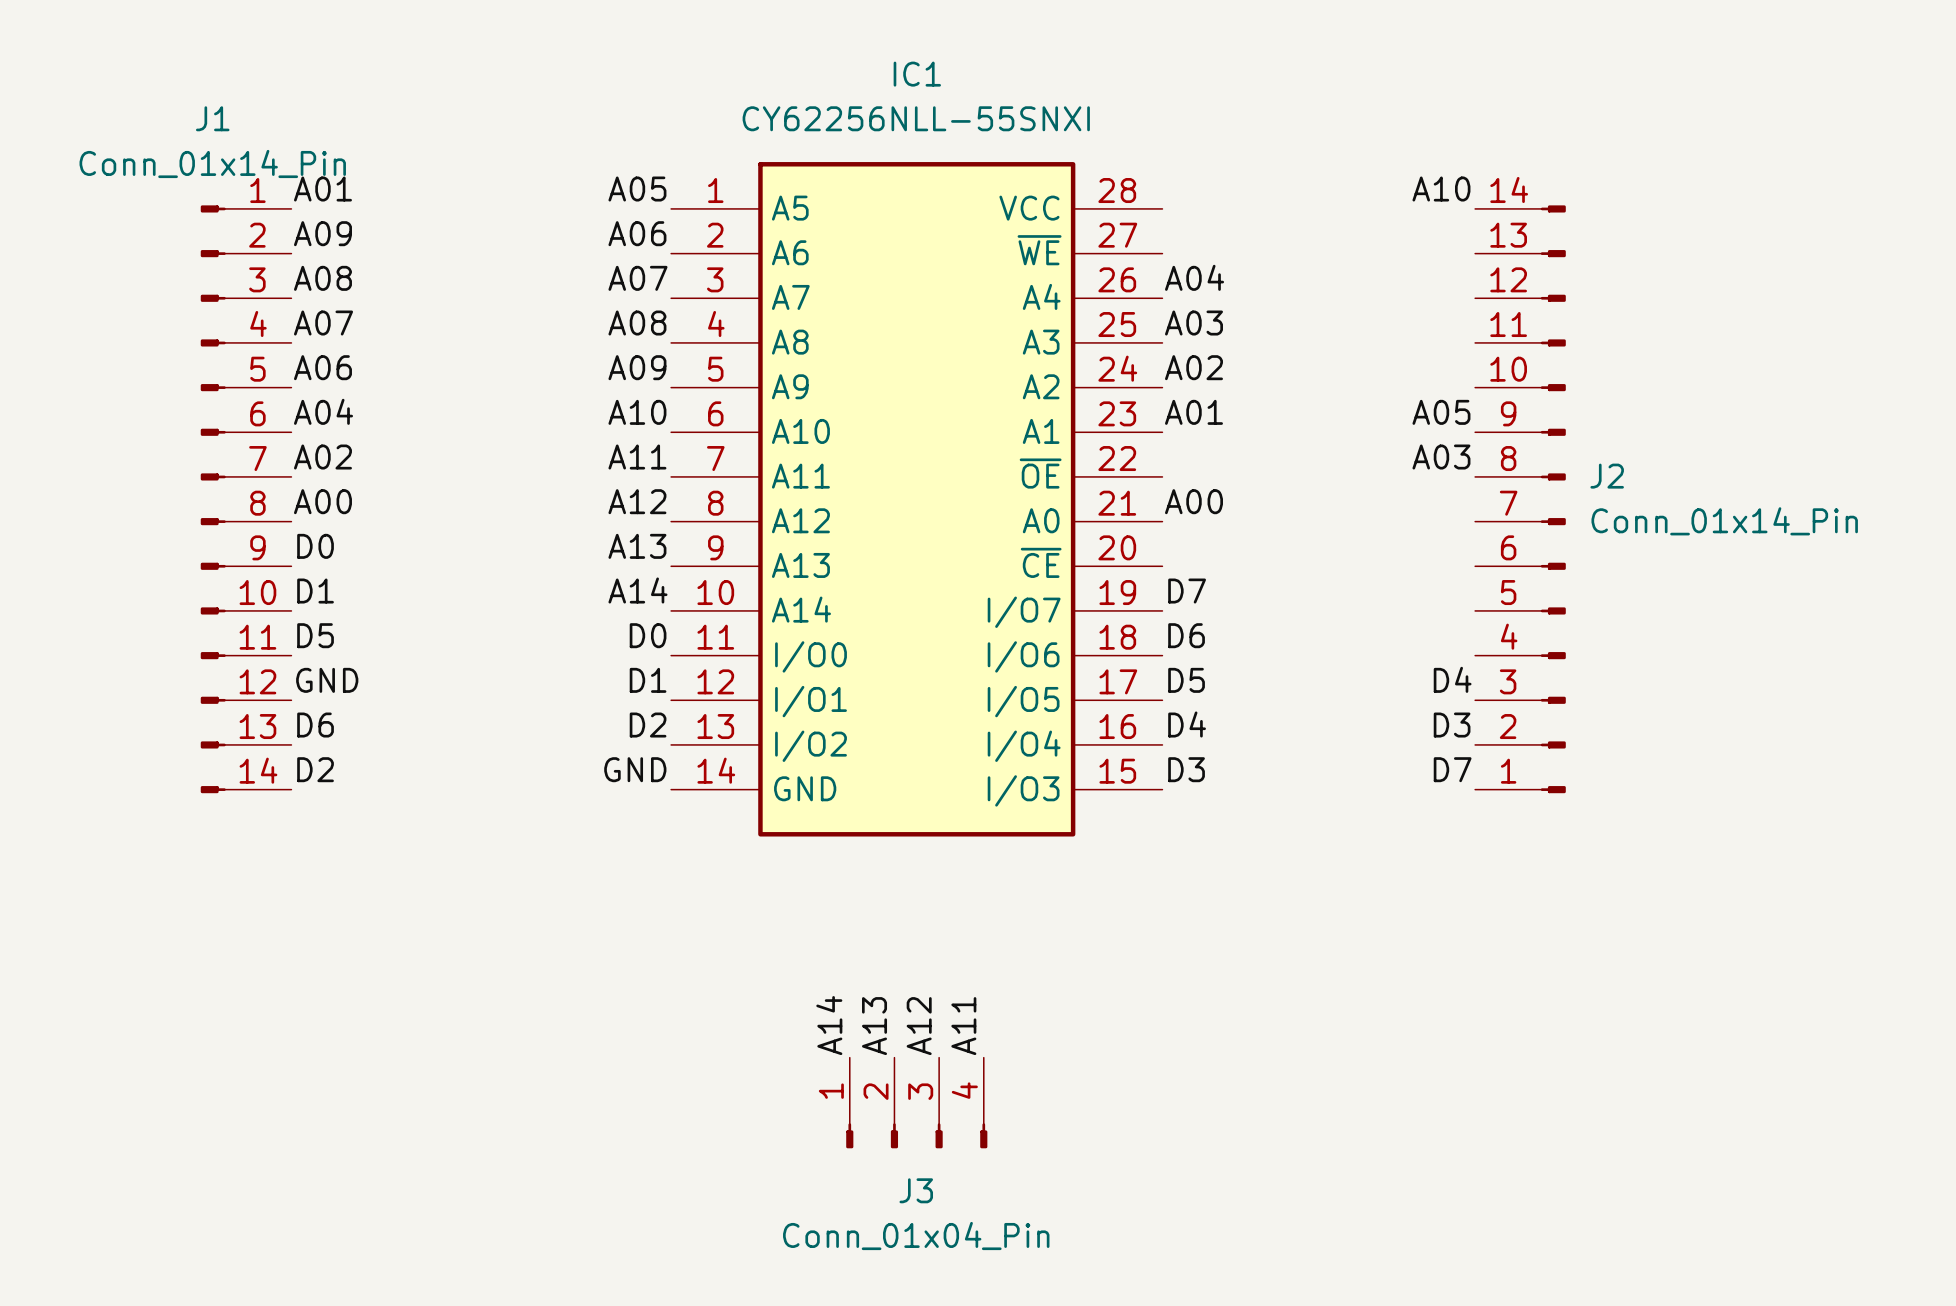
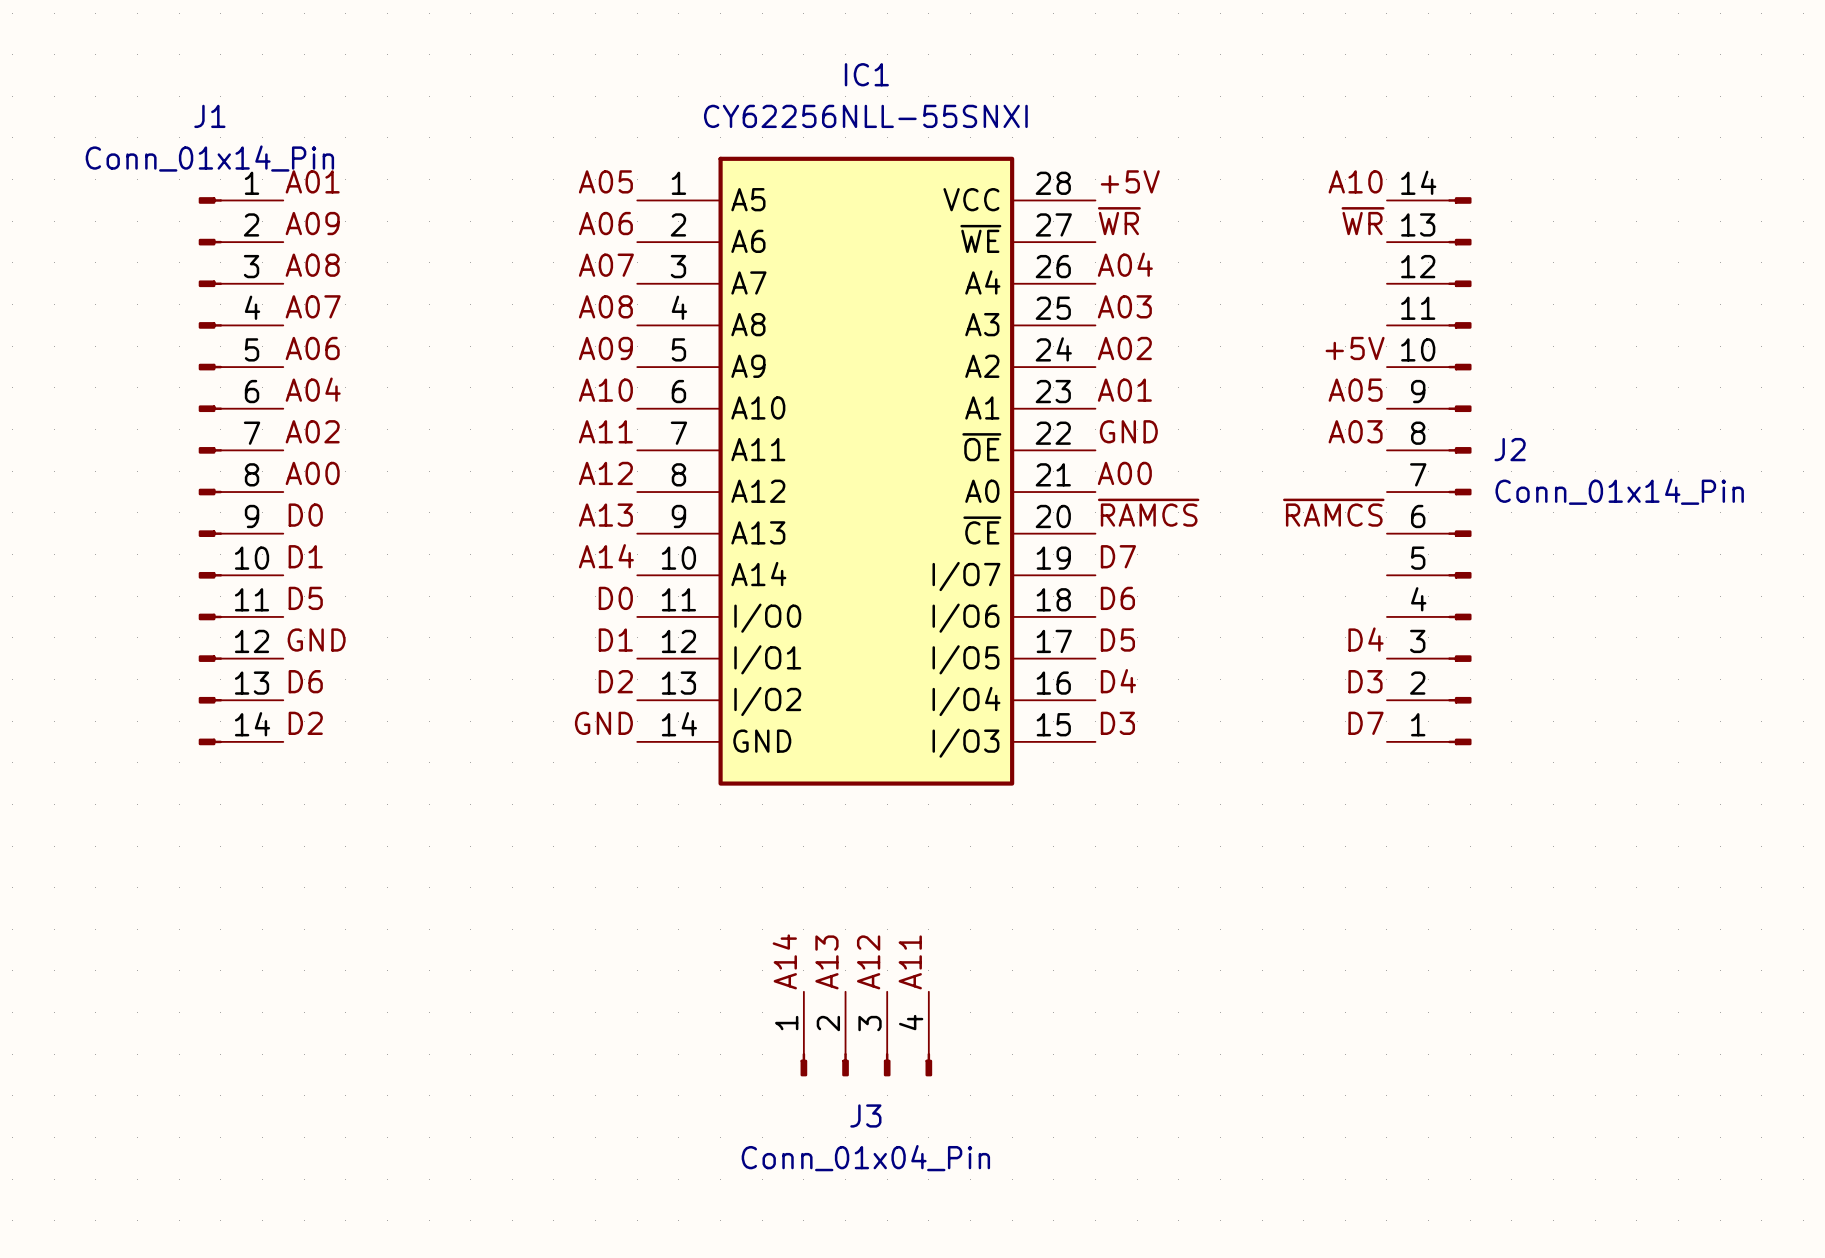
label: none -> +5V (1130, 181)
label: none -> ~{WR} (1119, 221)
label: none -> ~{WR} (1363, 221)
label: none -> +5V (1355, 348)
label: none -> GND (1128, 431)
label: none -> ~{RAMCS} (1148, 512)
label: none -> ~{RAMCS} (1333, 512)

